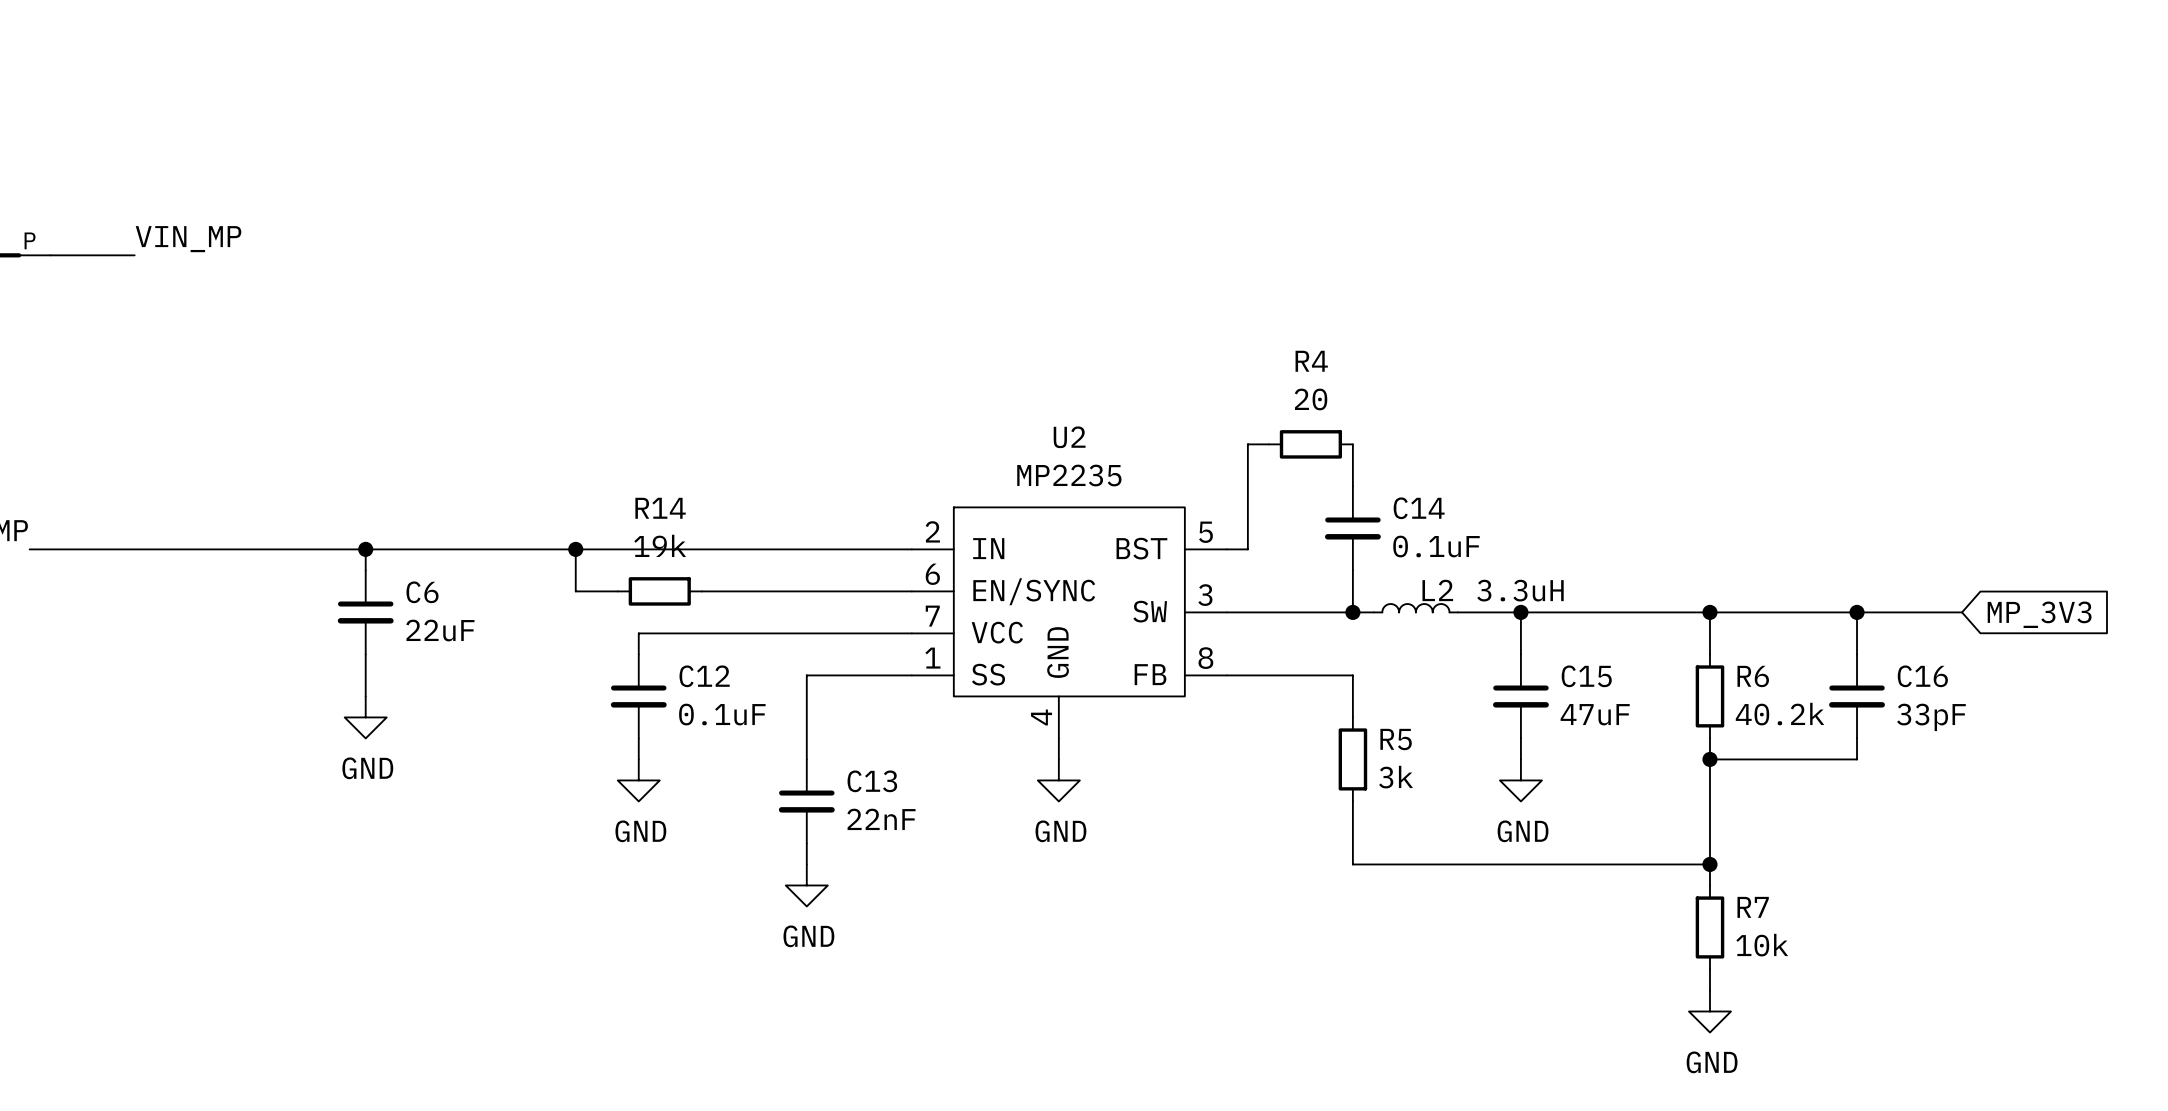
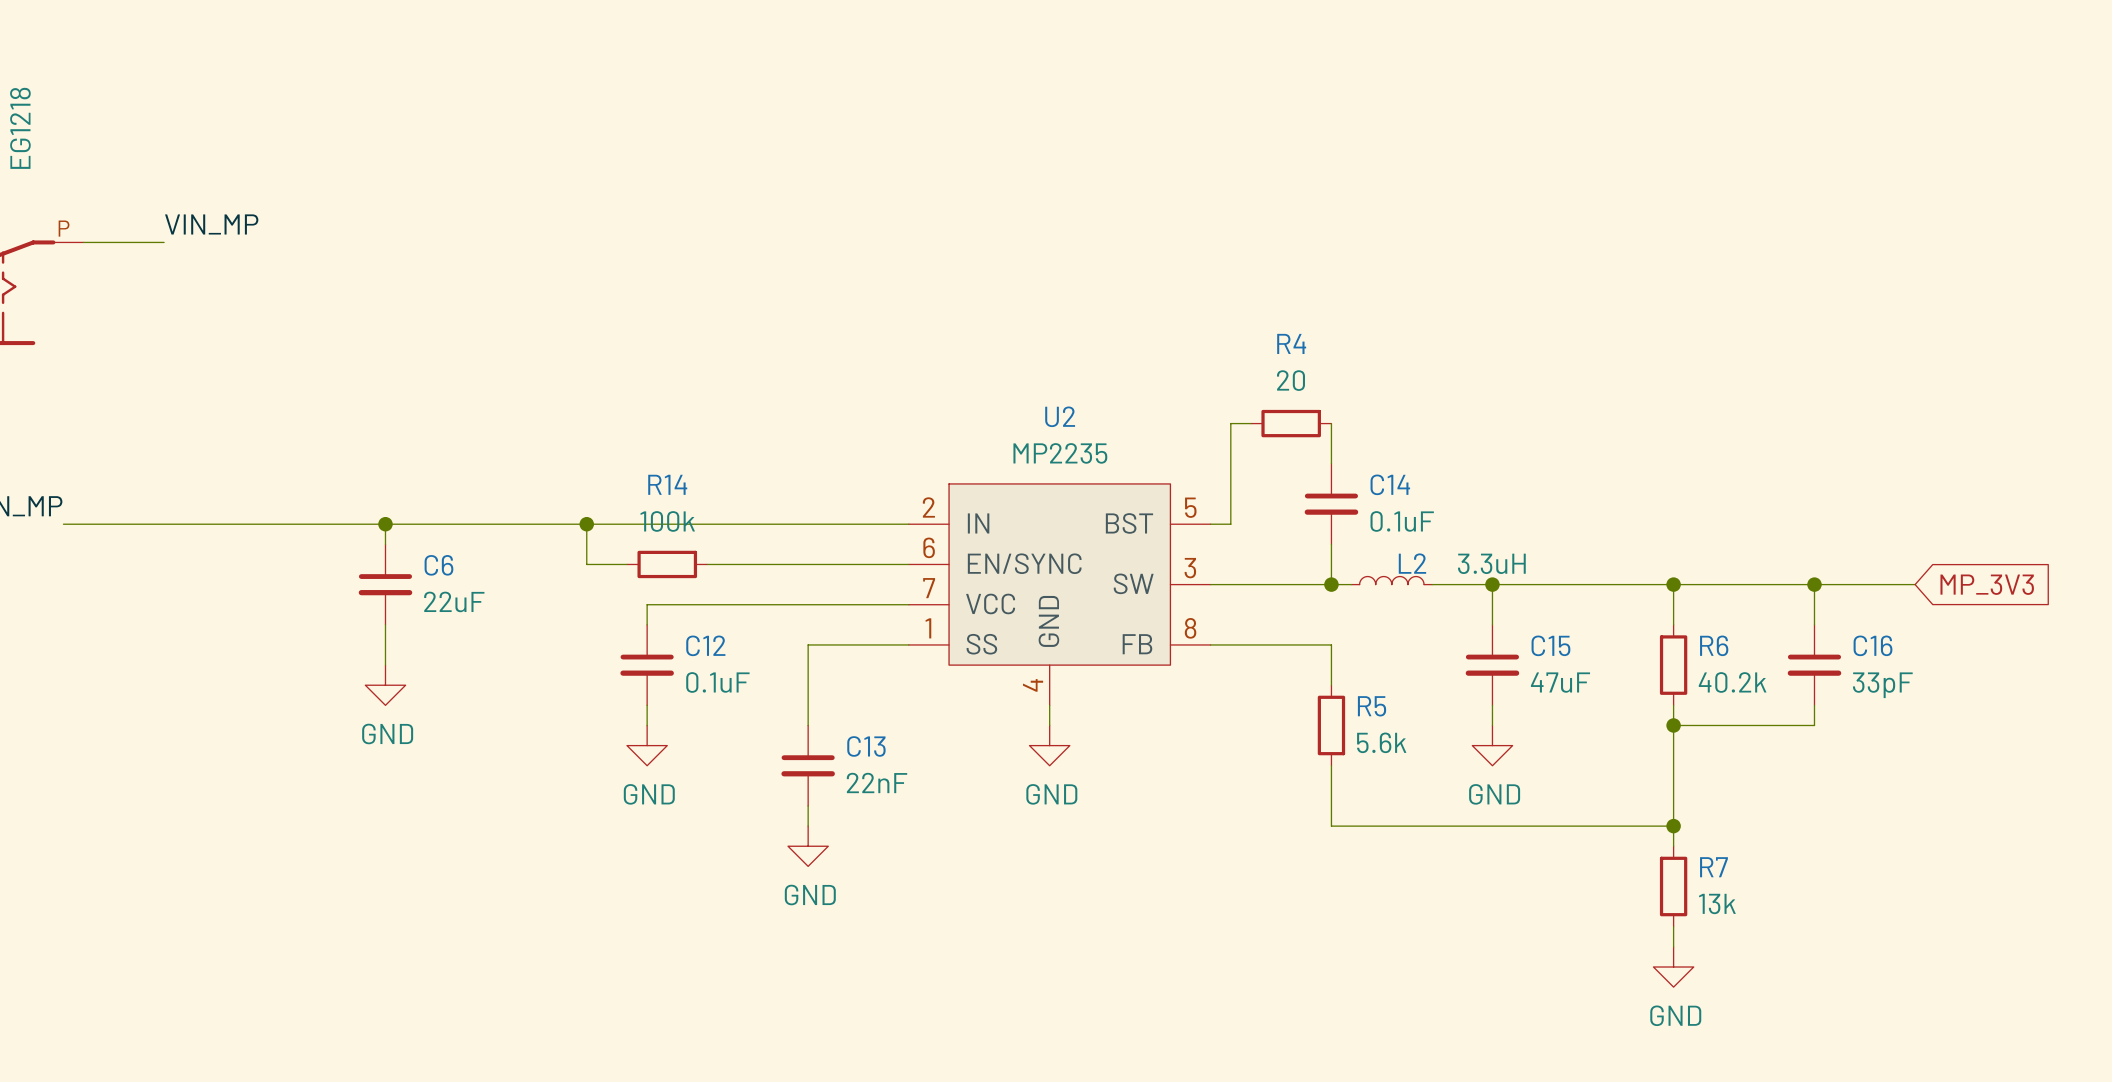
R14 value: 19k (660, 545) -> 100k (667, 521)
R5 value: 3k (1396, 777) -> 5.6k (1381, 742)
R7 value: 10k (1762, 945) -> 13k (1717, 903)

